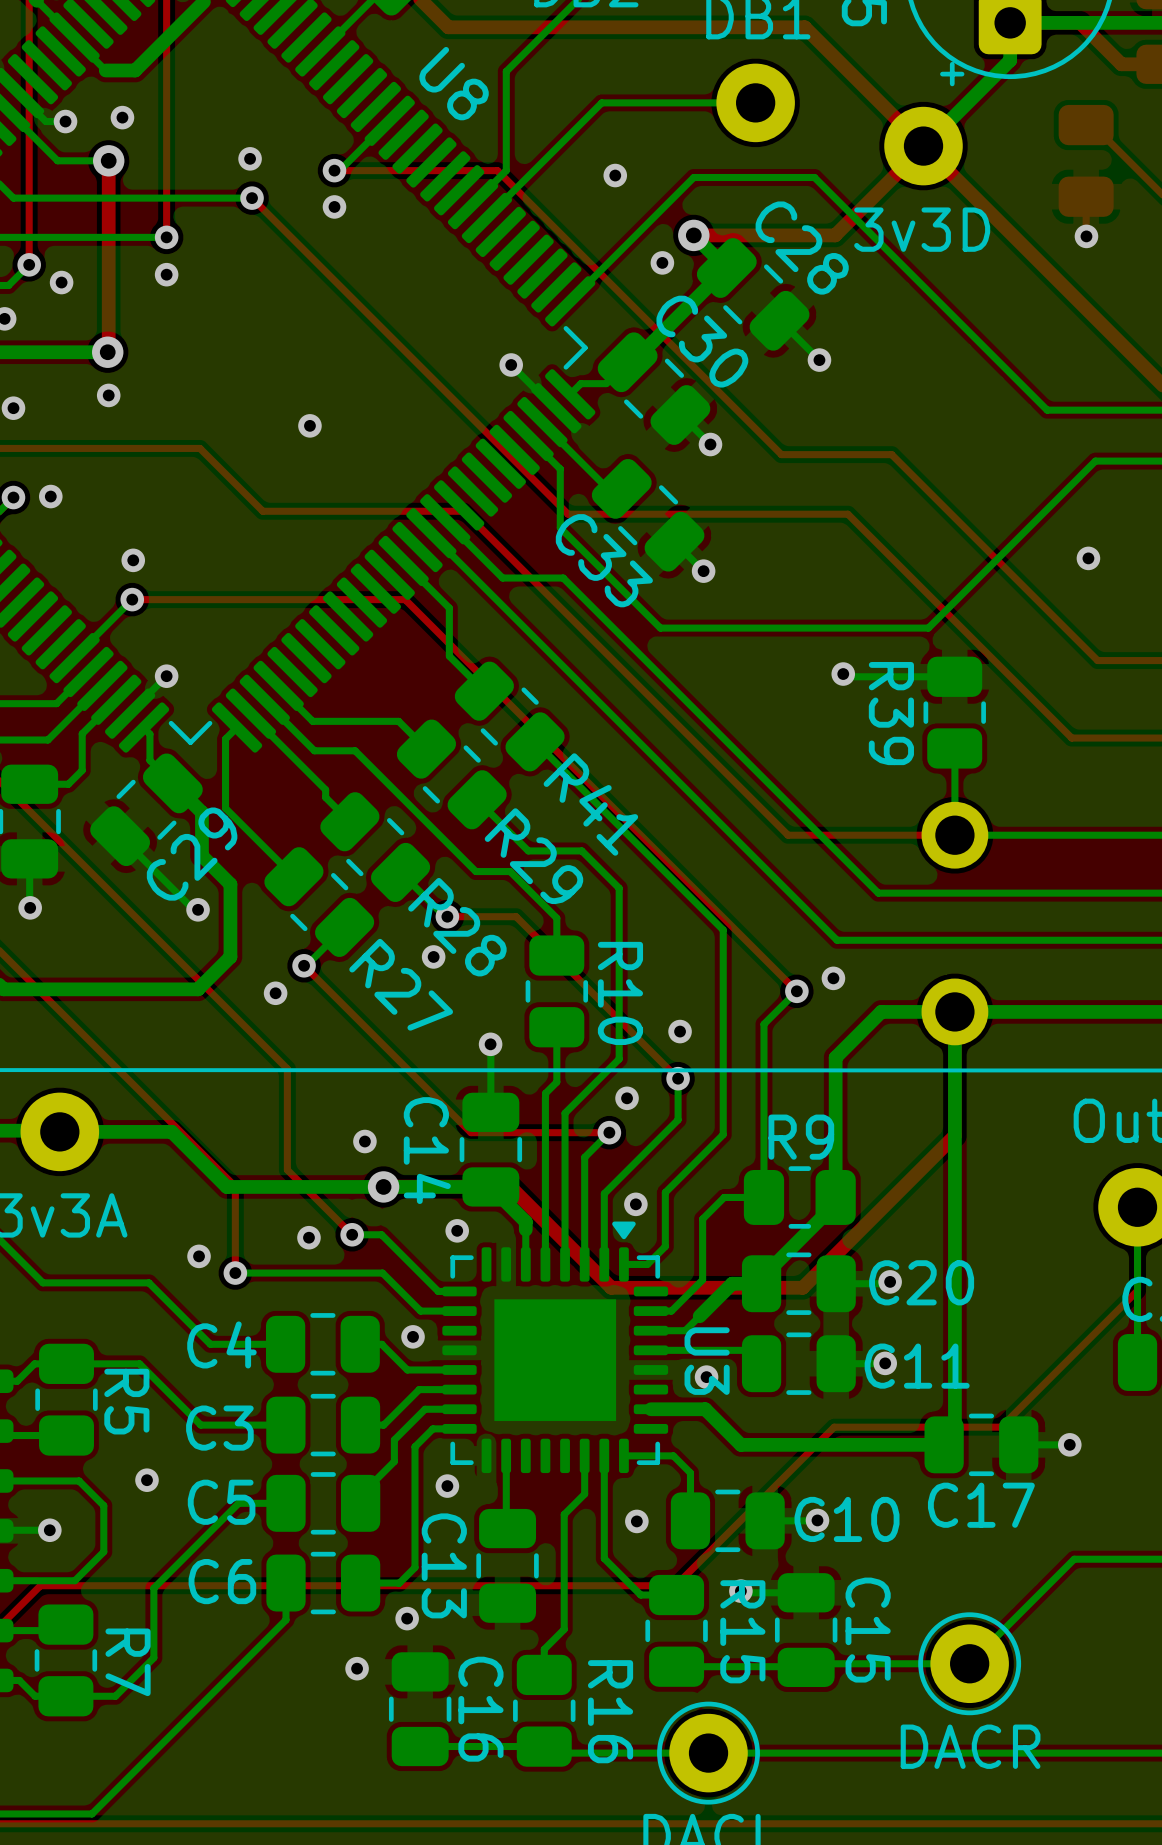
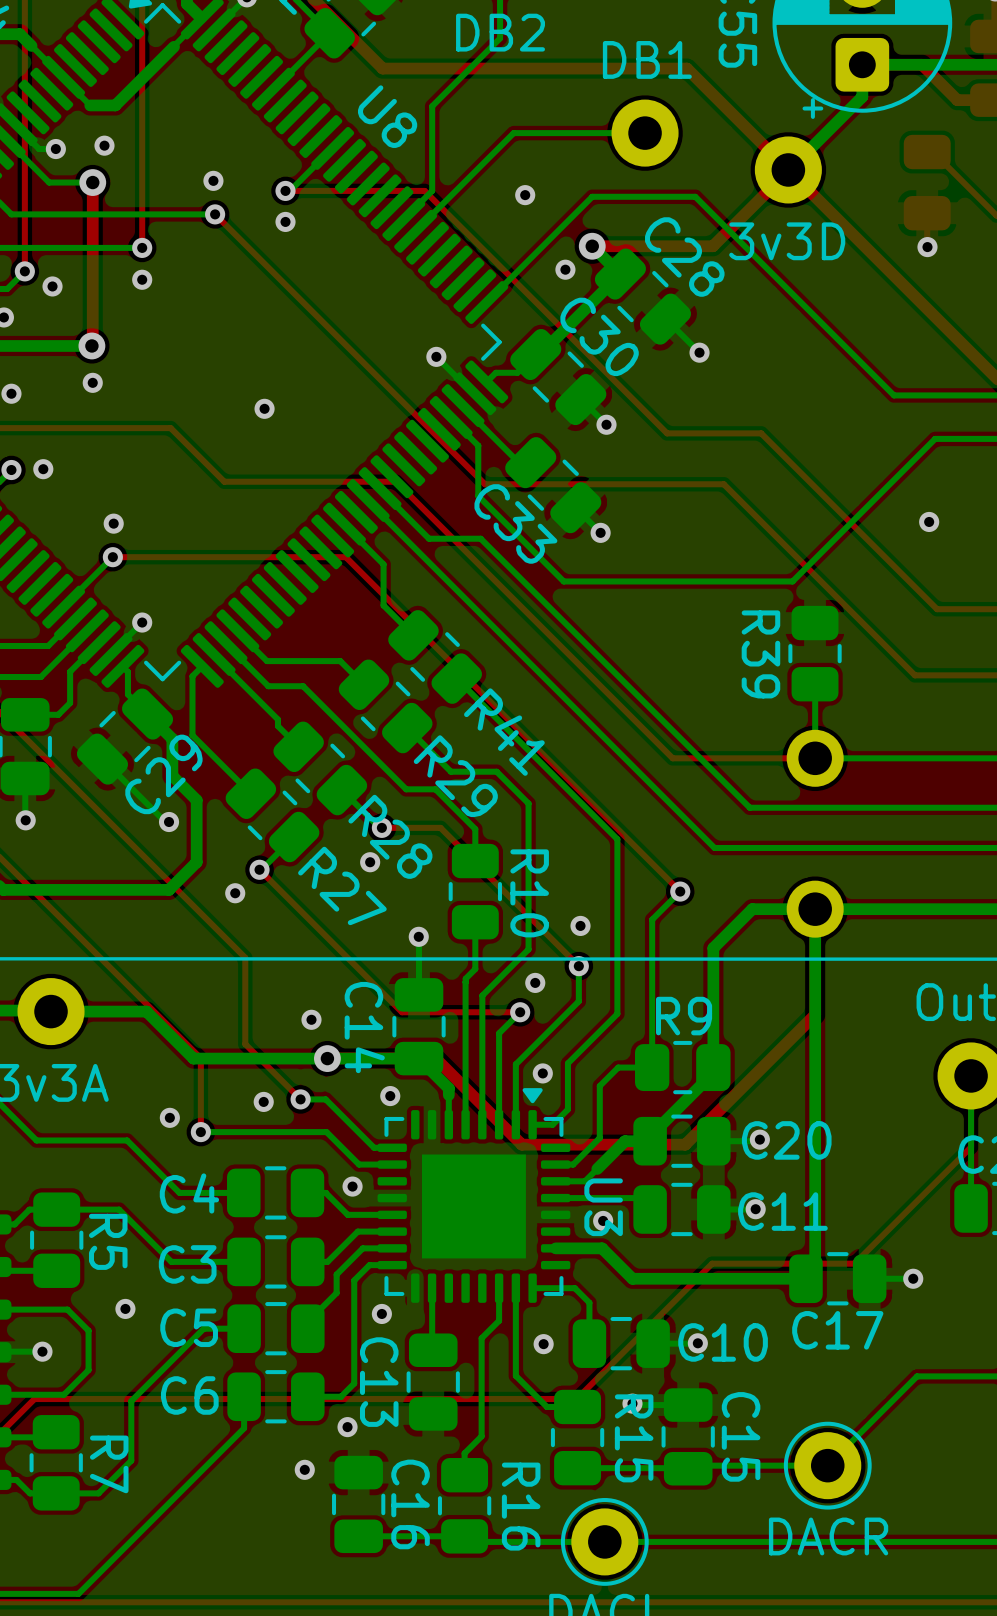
bottom track: (843, 674) (846, 676) (954, 676) -> none
via: (843, 674) -> none
via: (833, 978) -> none

